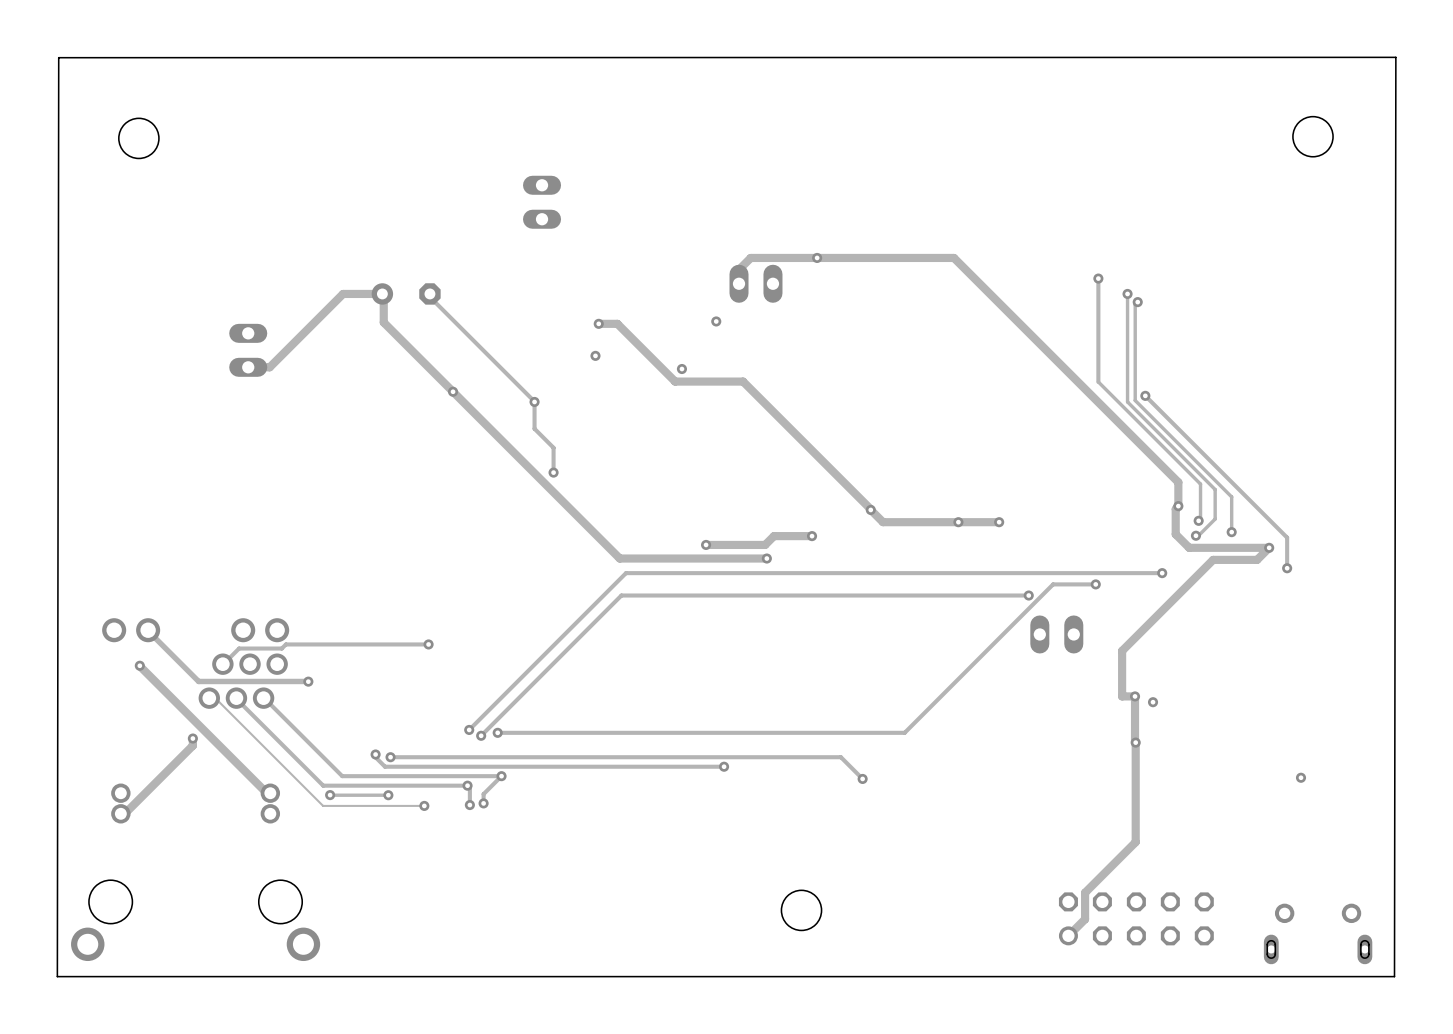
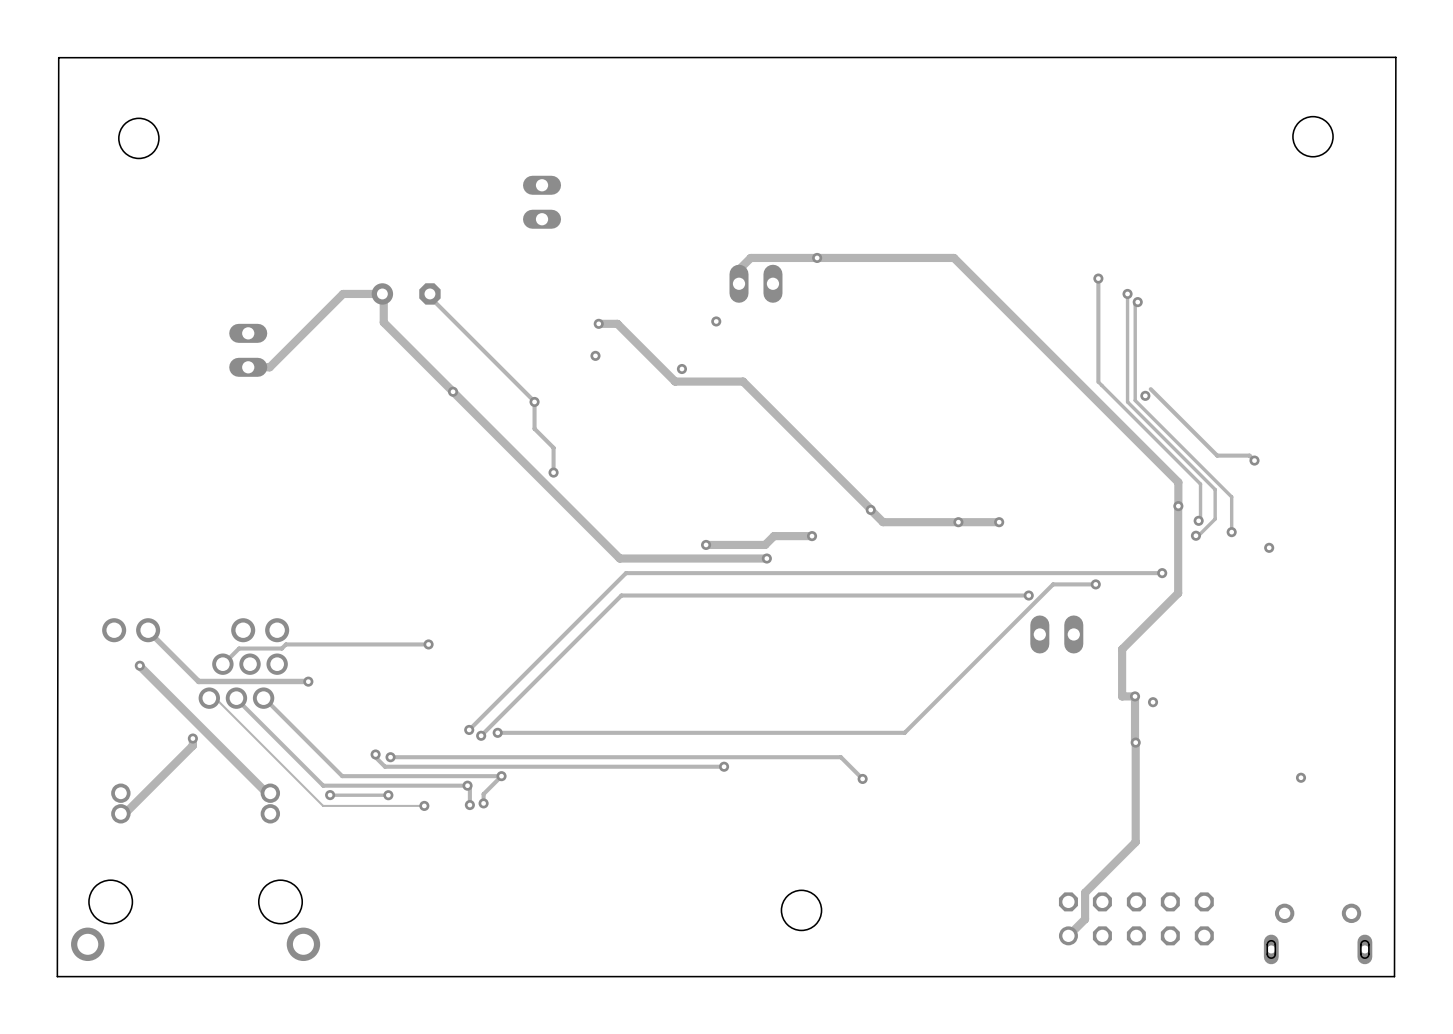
track: none -> (1150, 389) (1217, 455) (1249, 455) (1254, 460)
track: (1145, 395) (1287, 537) (1287, 568) -> none
via: none -> (1254, 460)
track: (1178, 506) (1175, 509) (1175, 534) (1189, 547) (1269, 547) (1257, 559) (1213, 559) (1122, 650) -> (1178, 506) (1178, 593) (1122, 650)
via: (1287, 568) -> none

